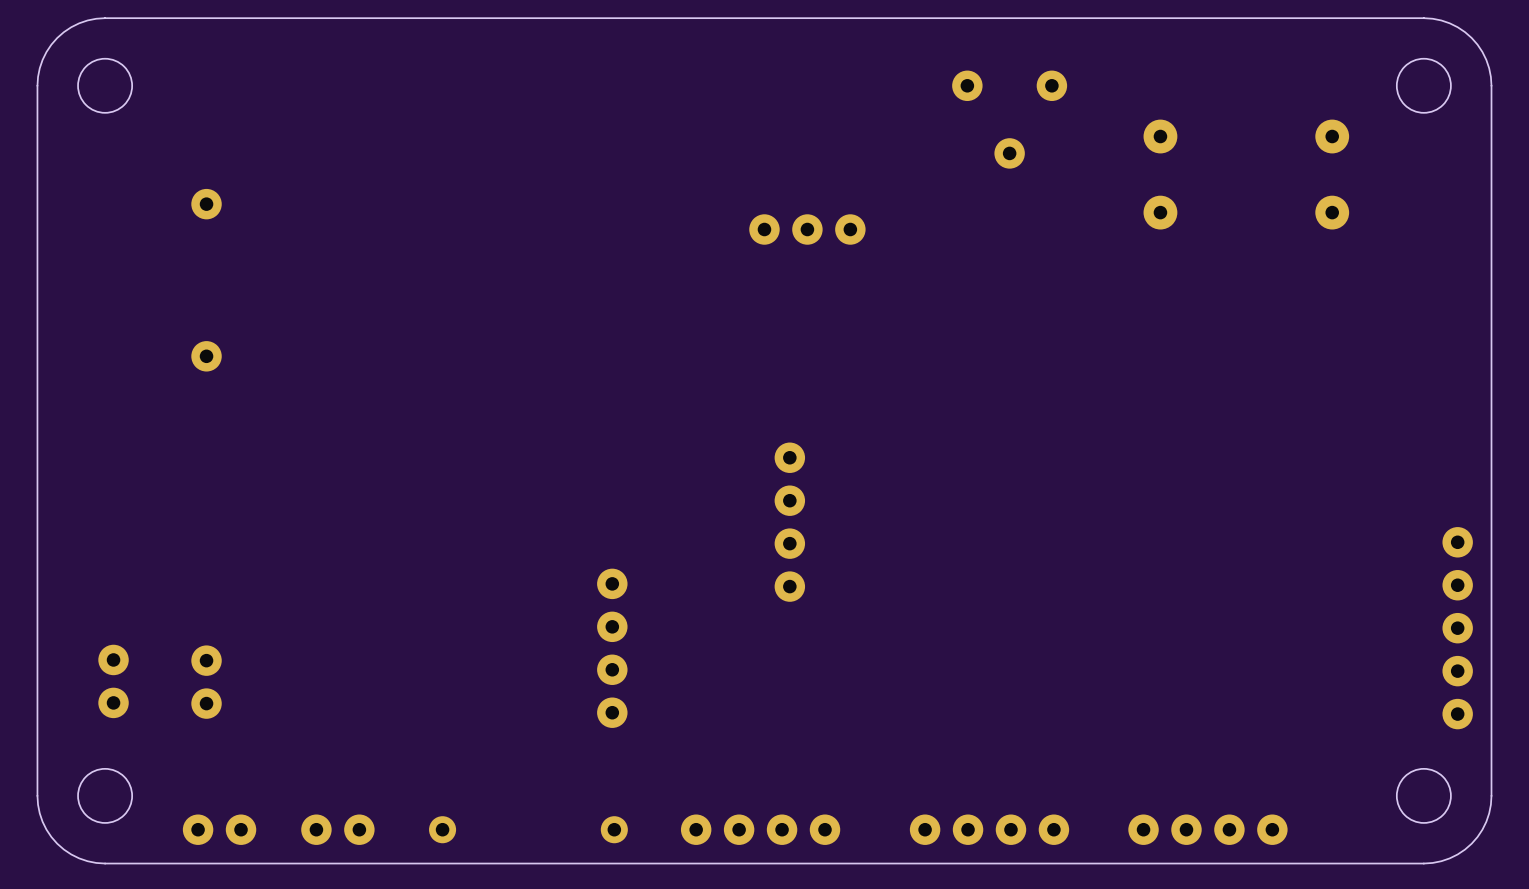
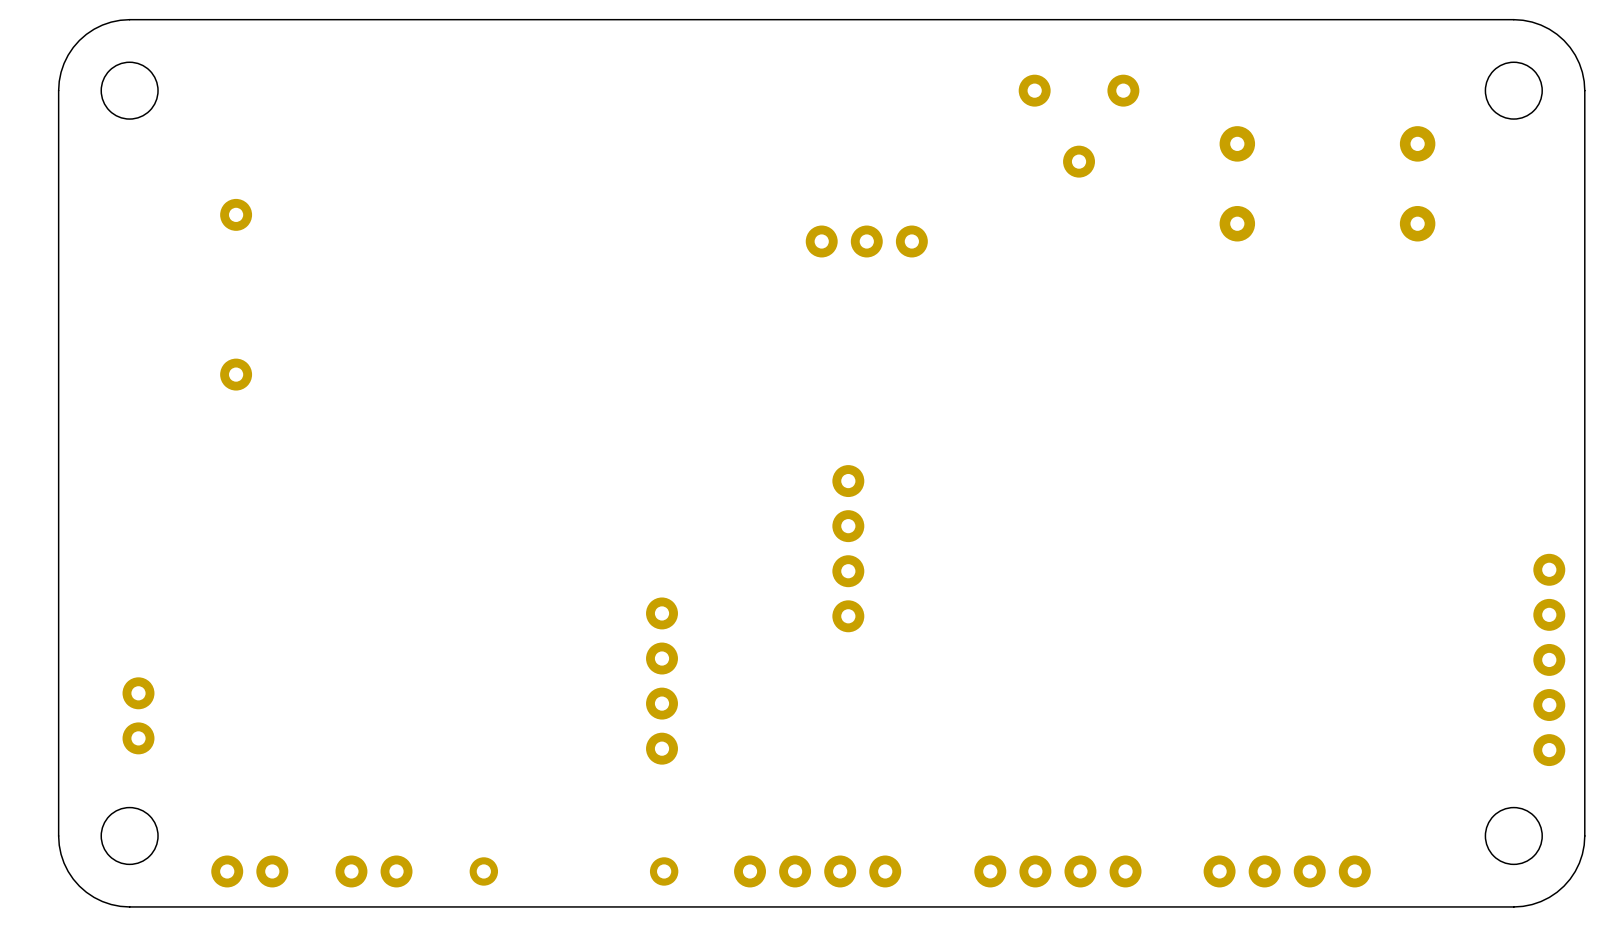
part: (206, 682) -> none

